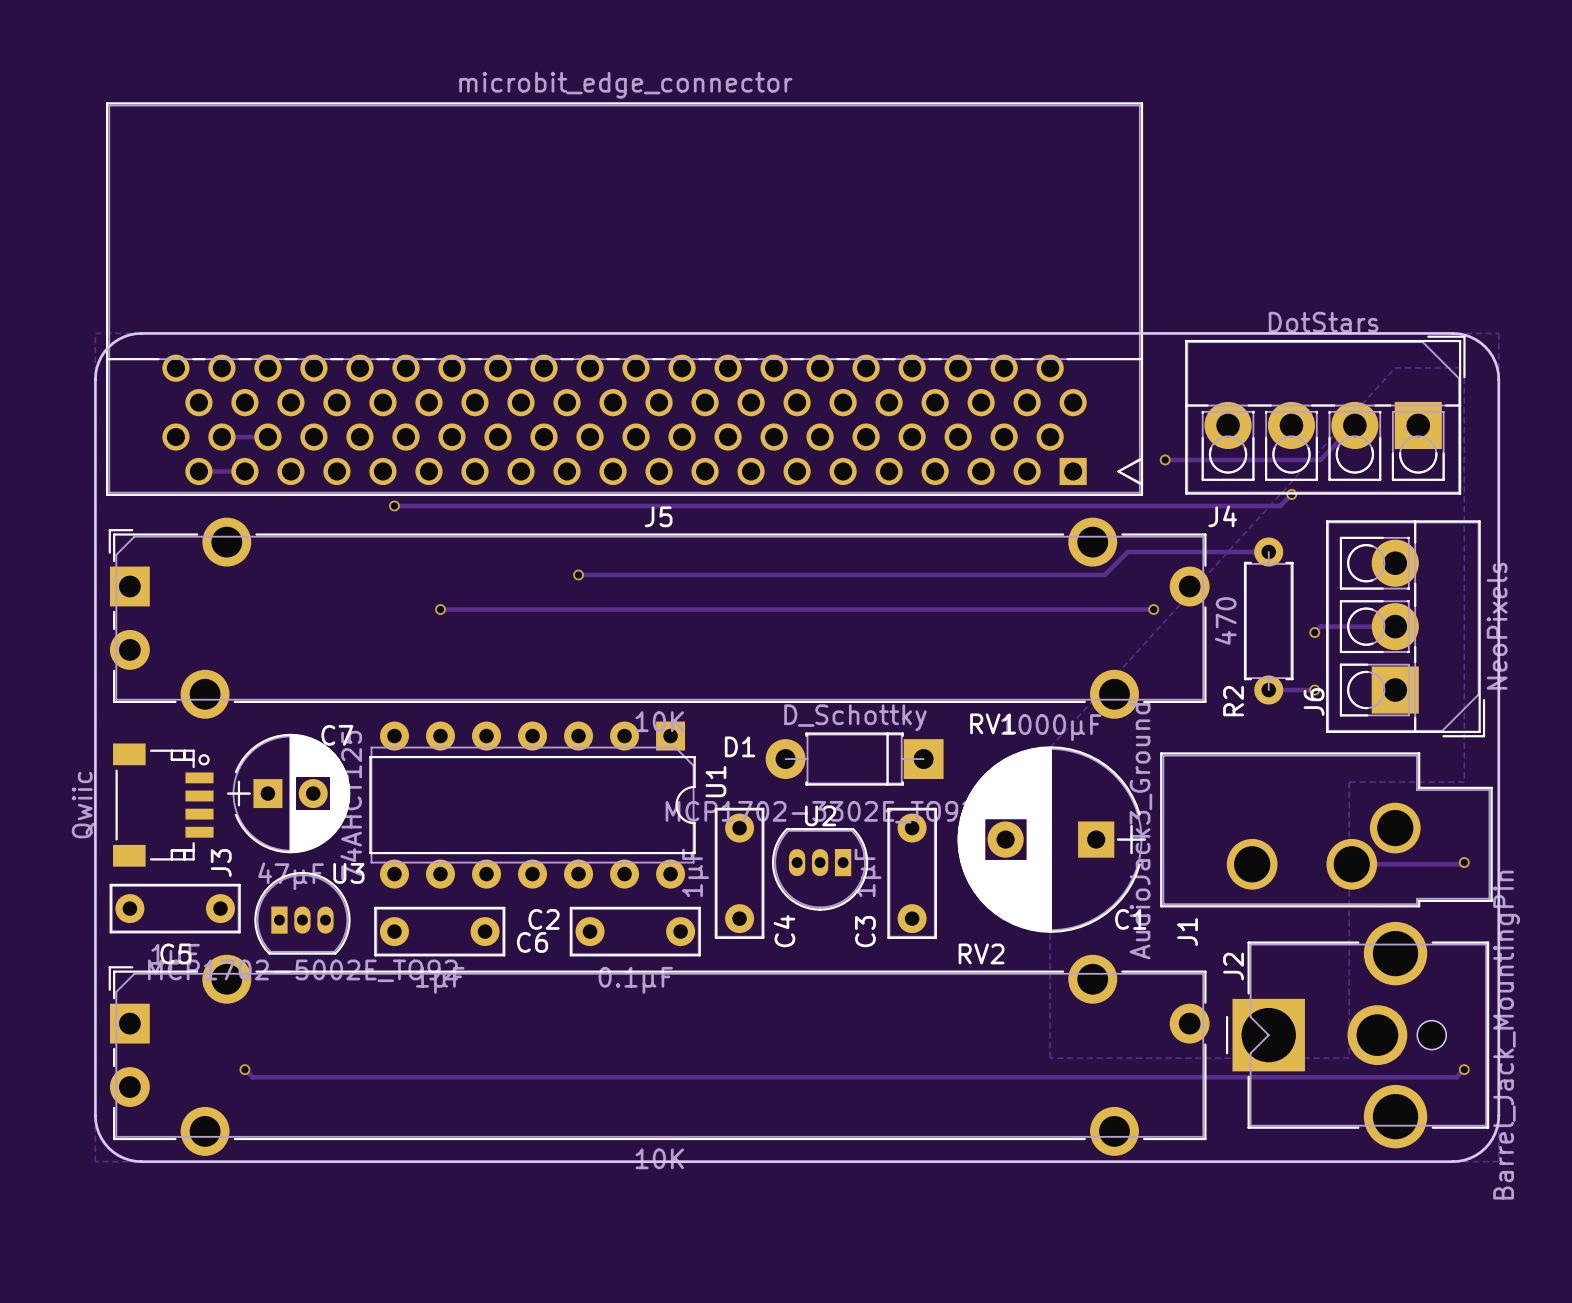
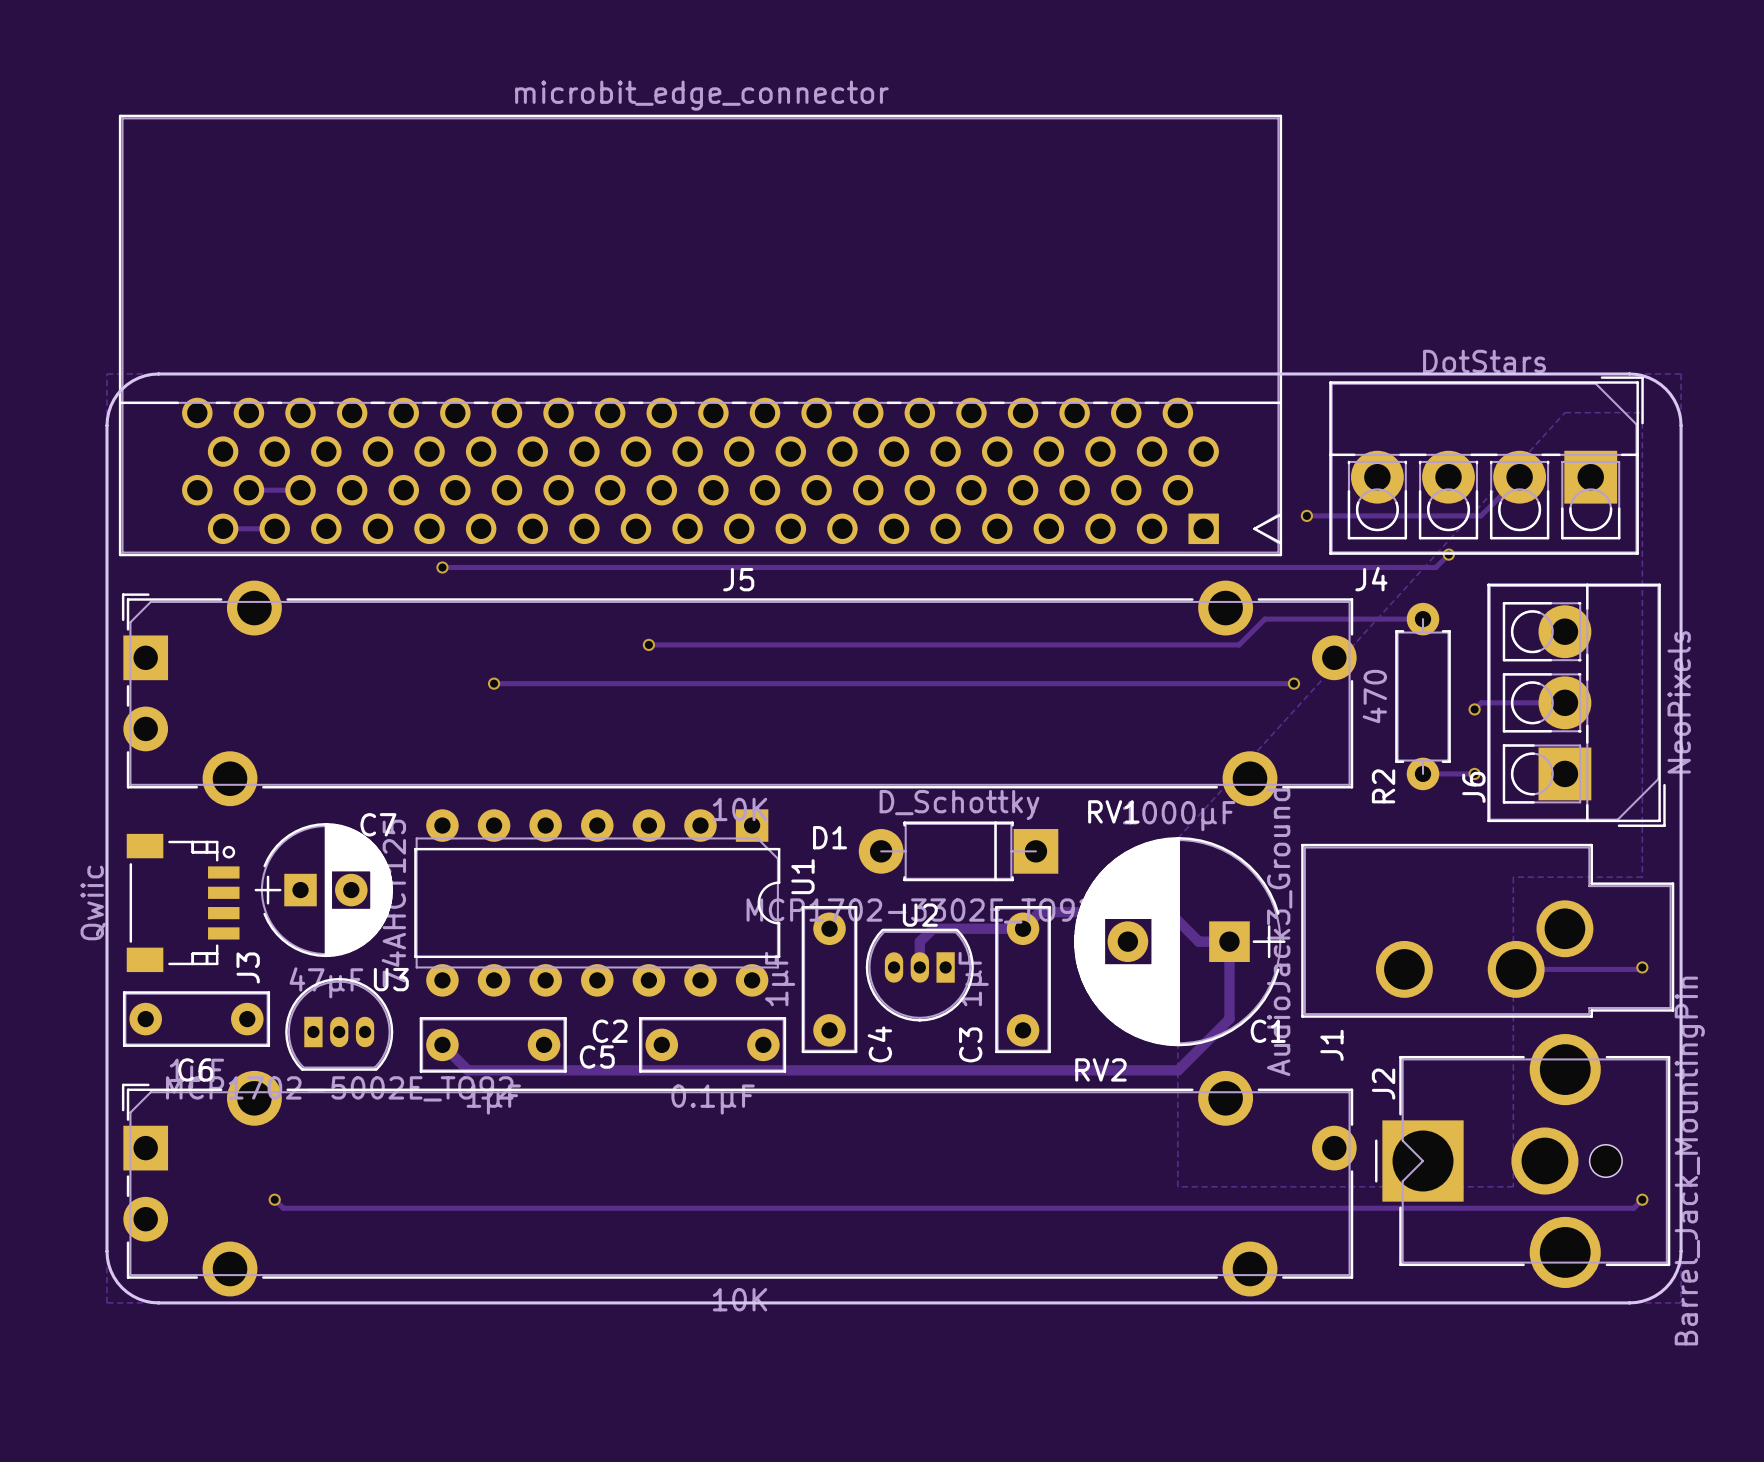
track: none -> (919, 967) (919, 941) (932, 928) (1023, 928) (1039, 912) (1169, 912) (1198, 941) (1229, 941) (1229, 1019) (1178, 1070) (467, 1070) (442, 1044)
C6 name: C6 (532, 942) -> C5 (597, 1057)
C5 name: C5 (175, 953) -> C6 (195, 1069)

